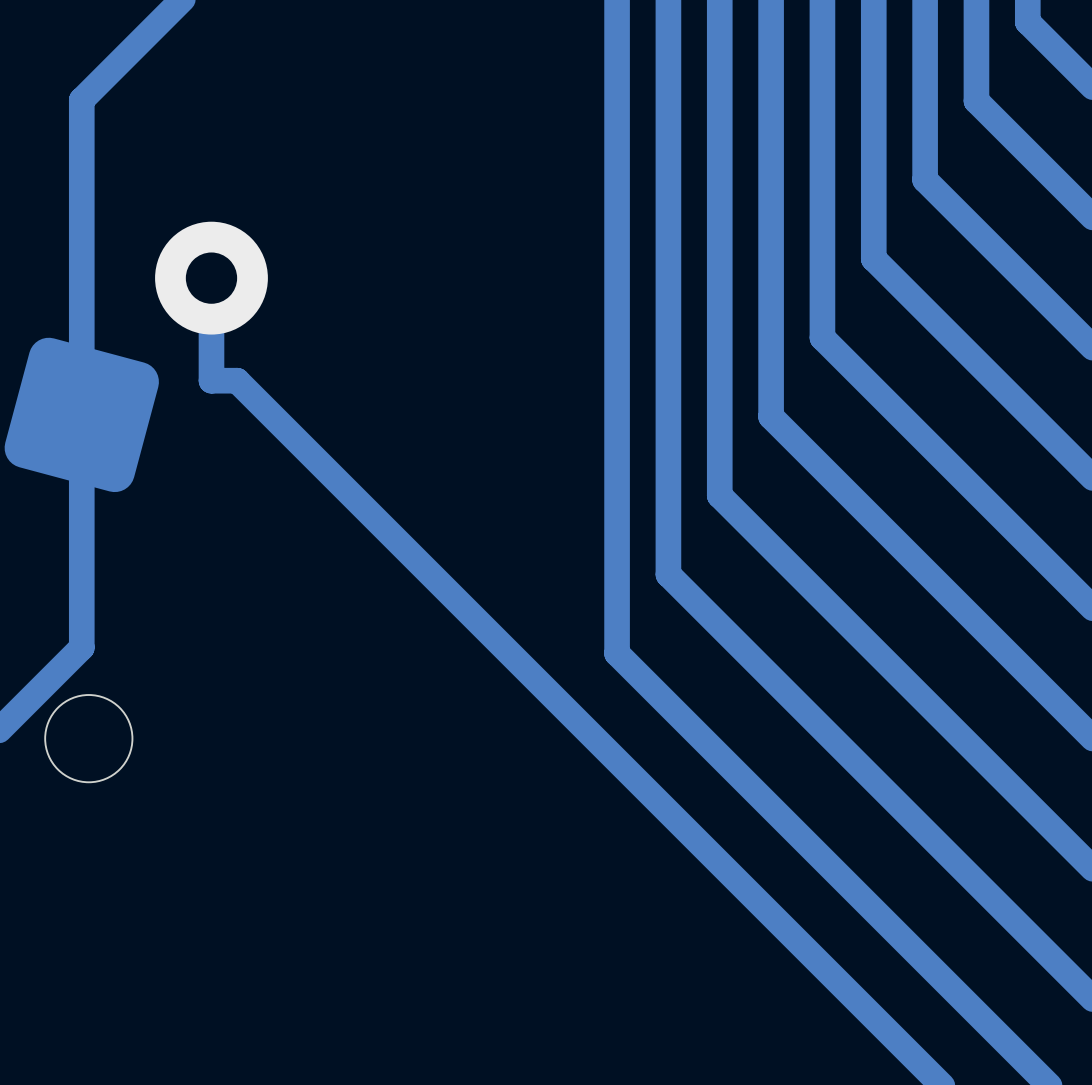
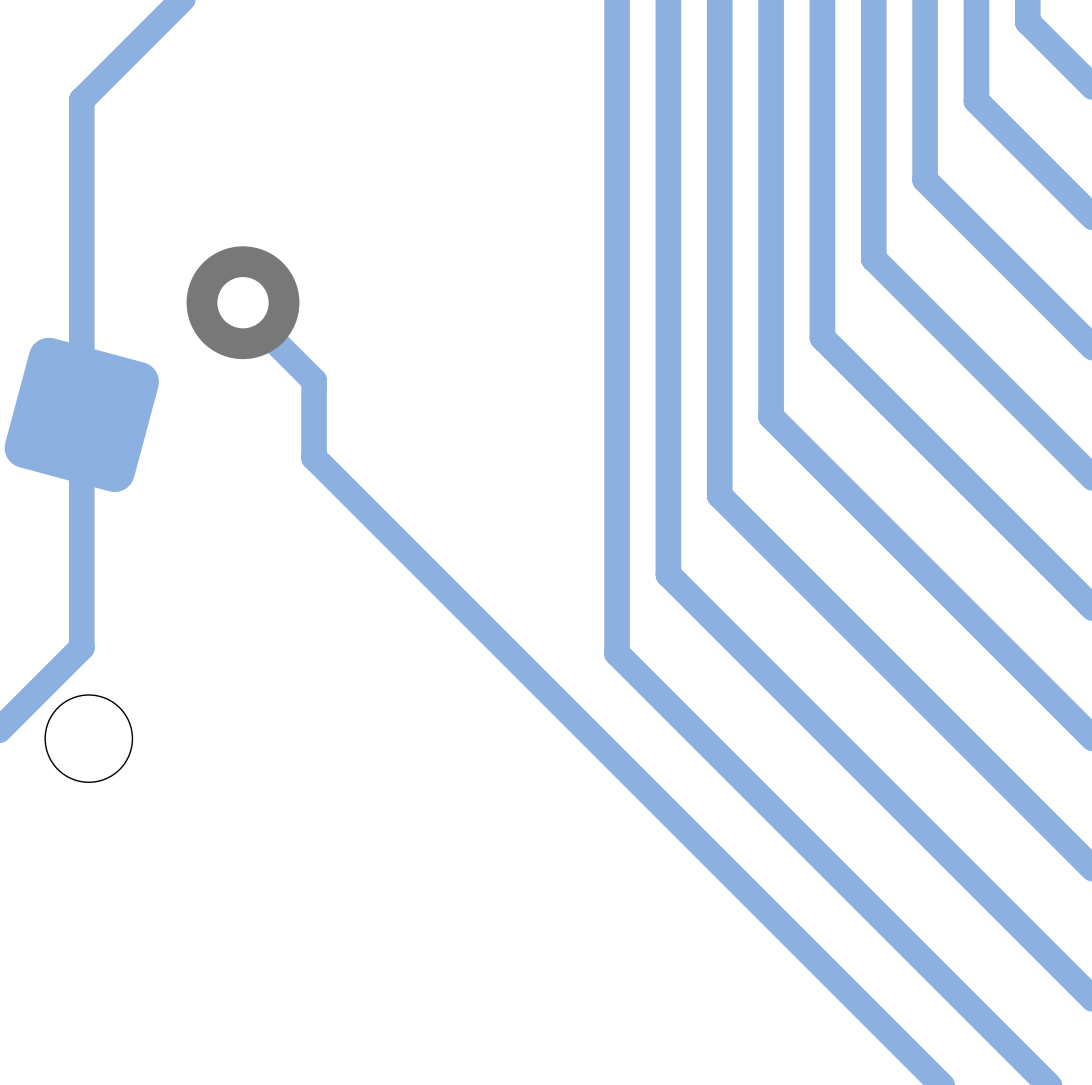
track: (211, 278) (211, 380) (237, 380) (314, 457) -> (243, 302) (243, 309) (314, 380) (314, 457)
via position: (211, 278) -> (243, 302)

